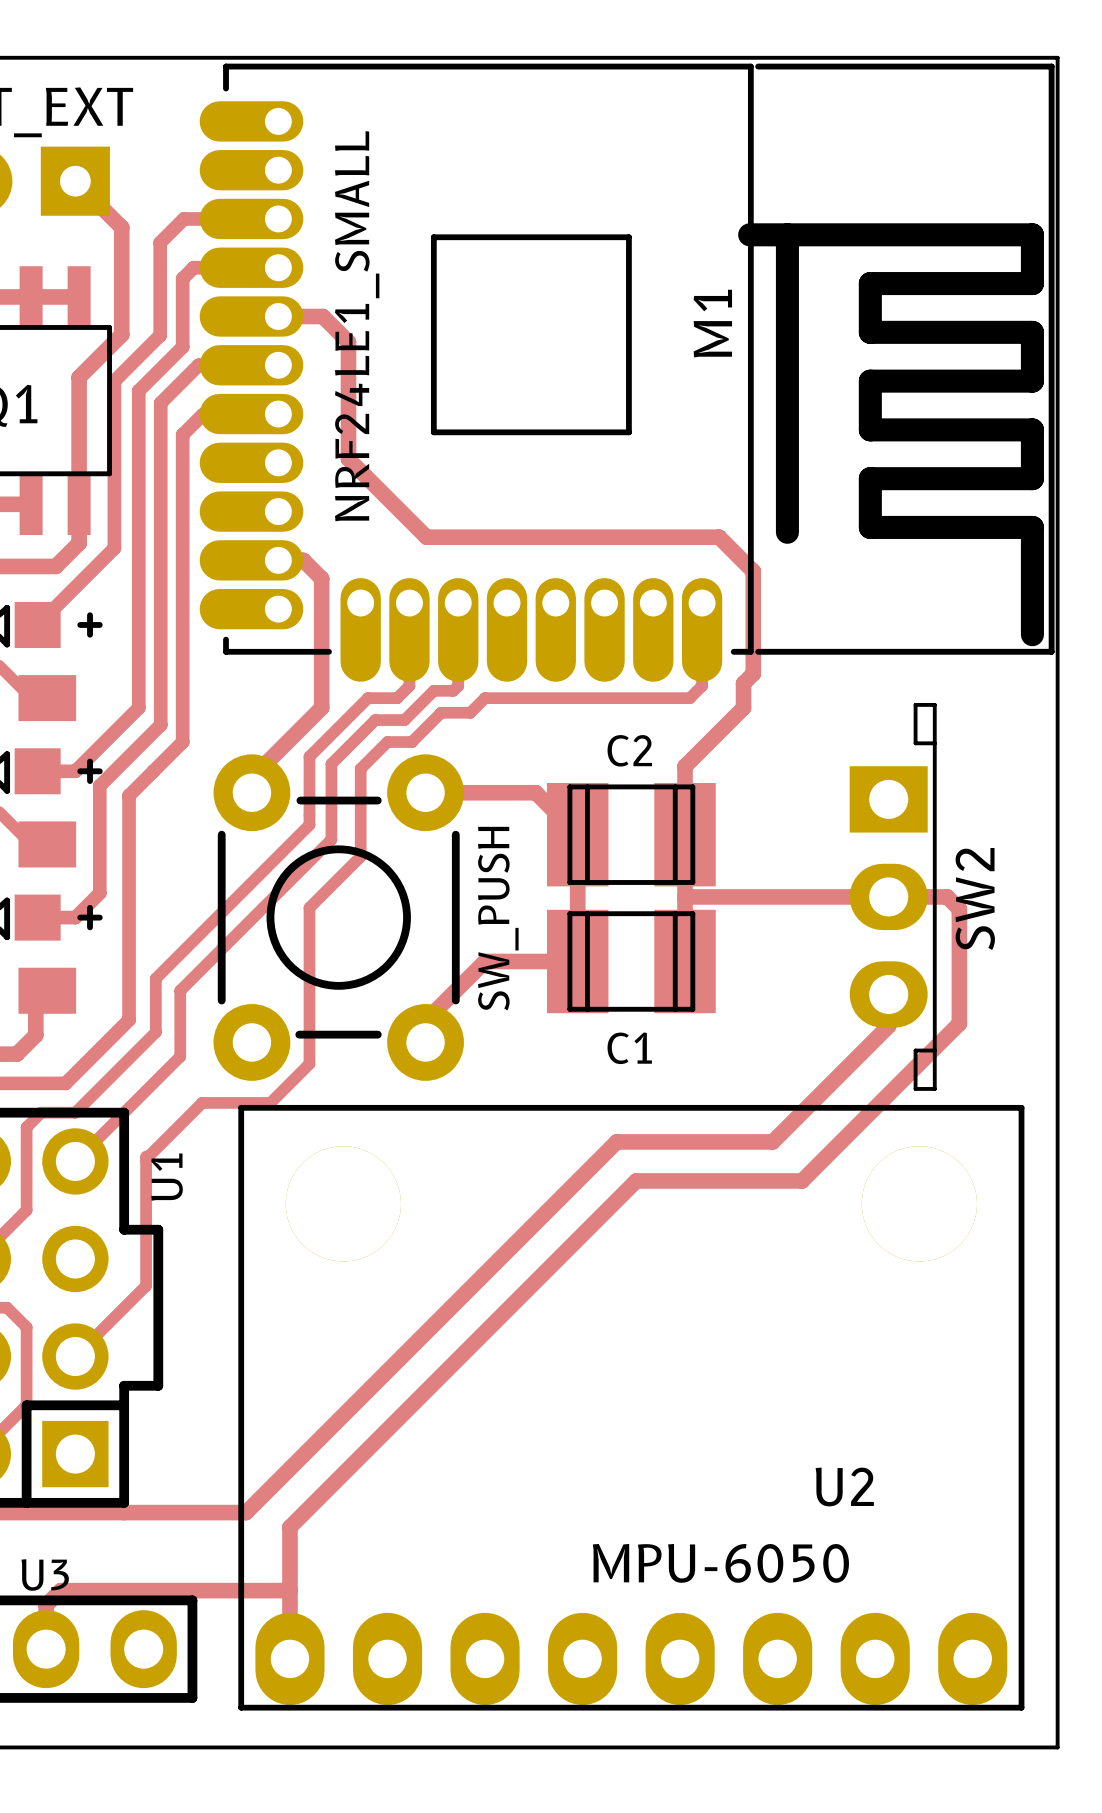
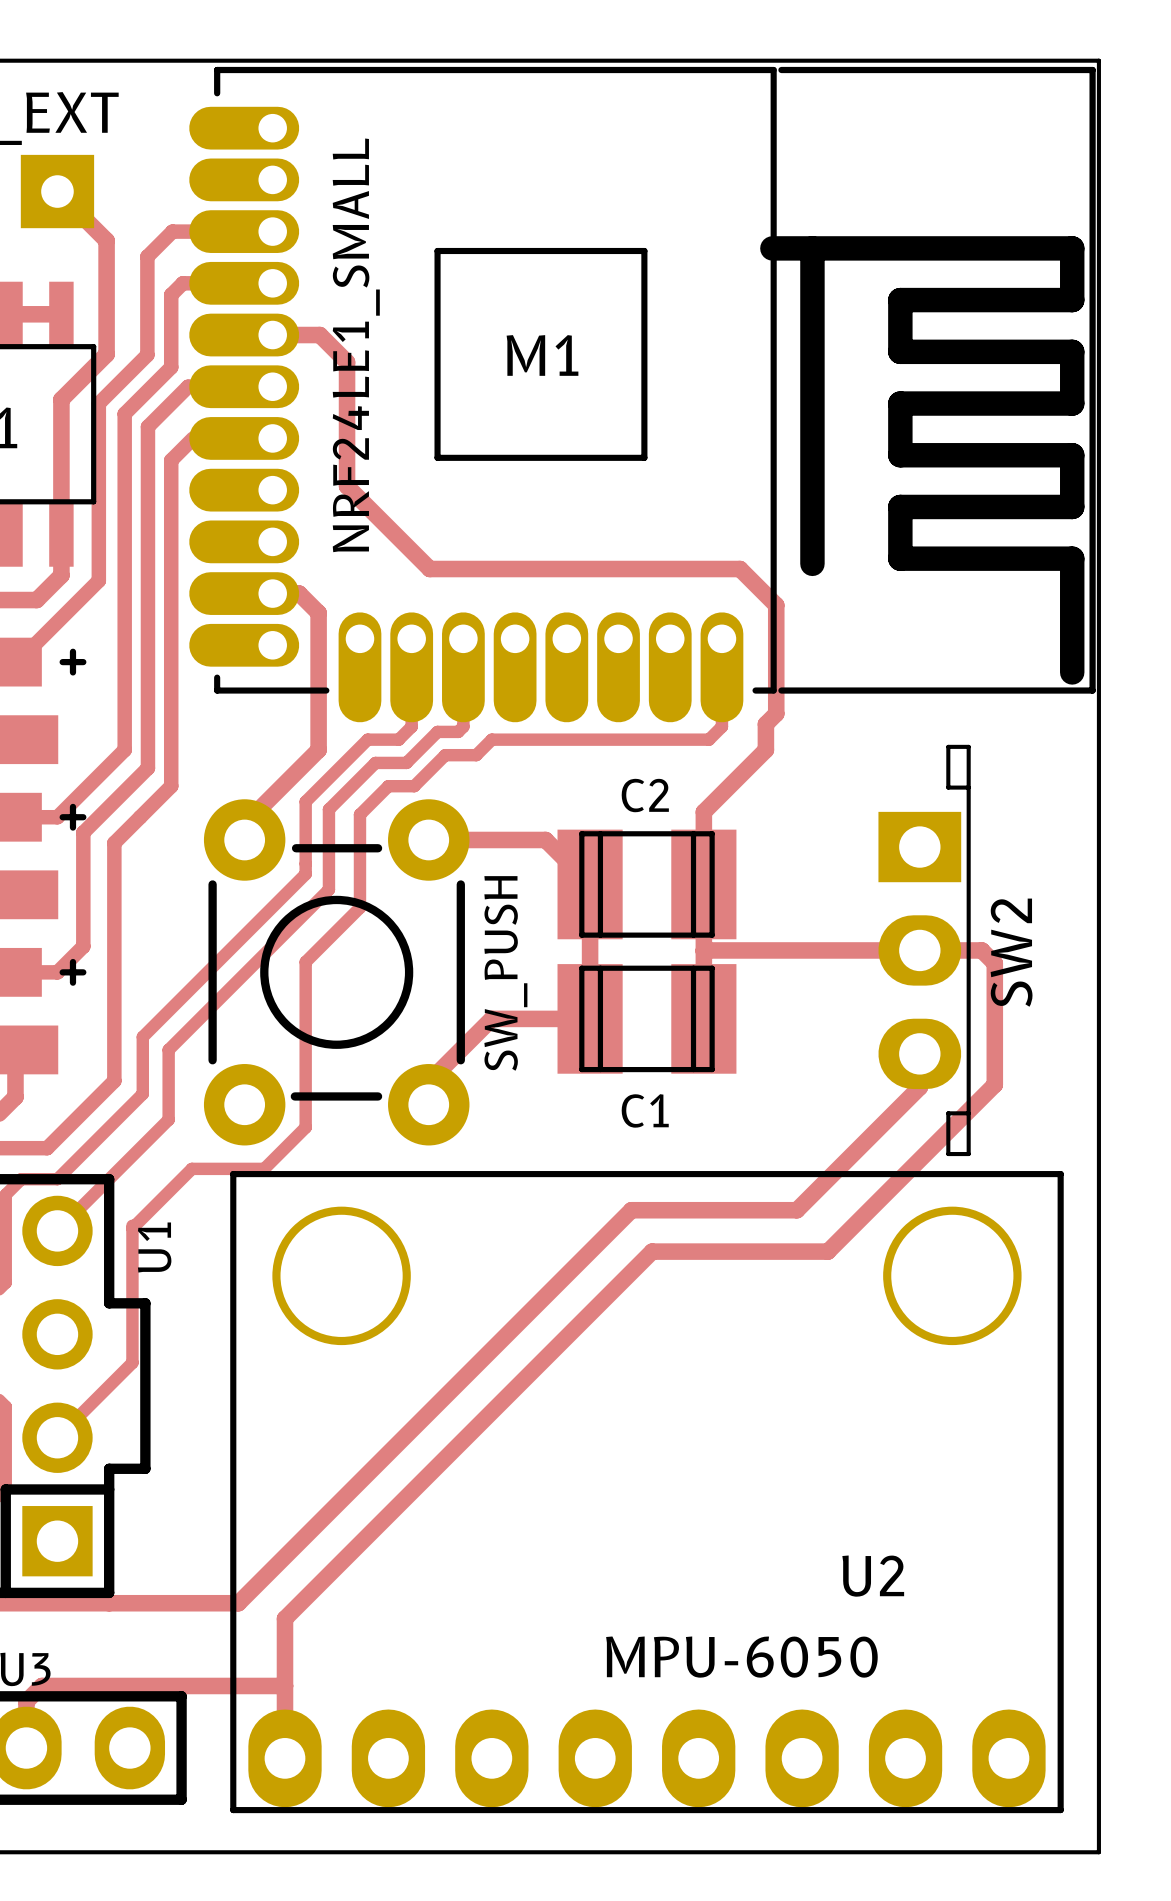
M1 name rotation: 0° (712, 323) -> 90° clockwise (542, 355)
M1 name position: M1 (712, 323) -> M1 (542, 355)
U2 footprint: [238, 1104, 1025, 1711] -> [230, 1171, 1064, 1814]

